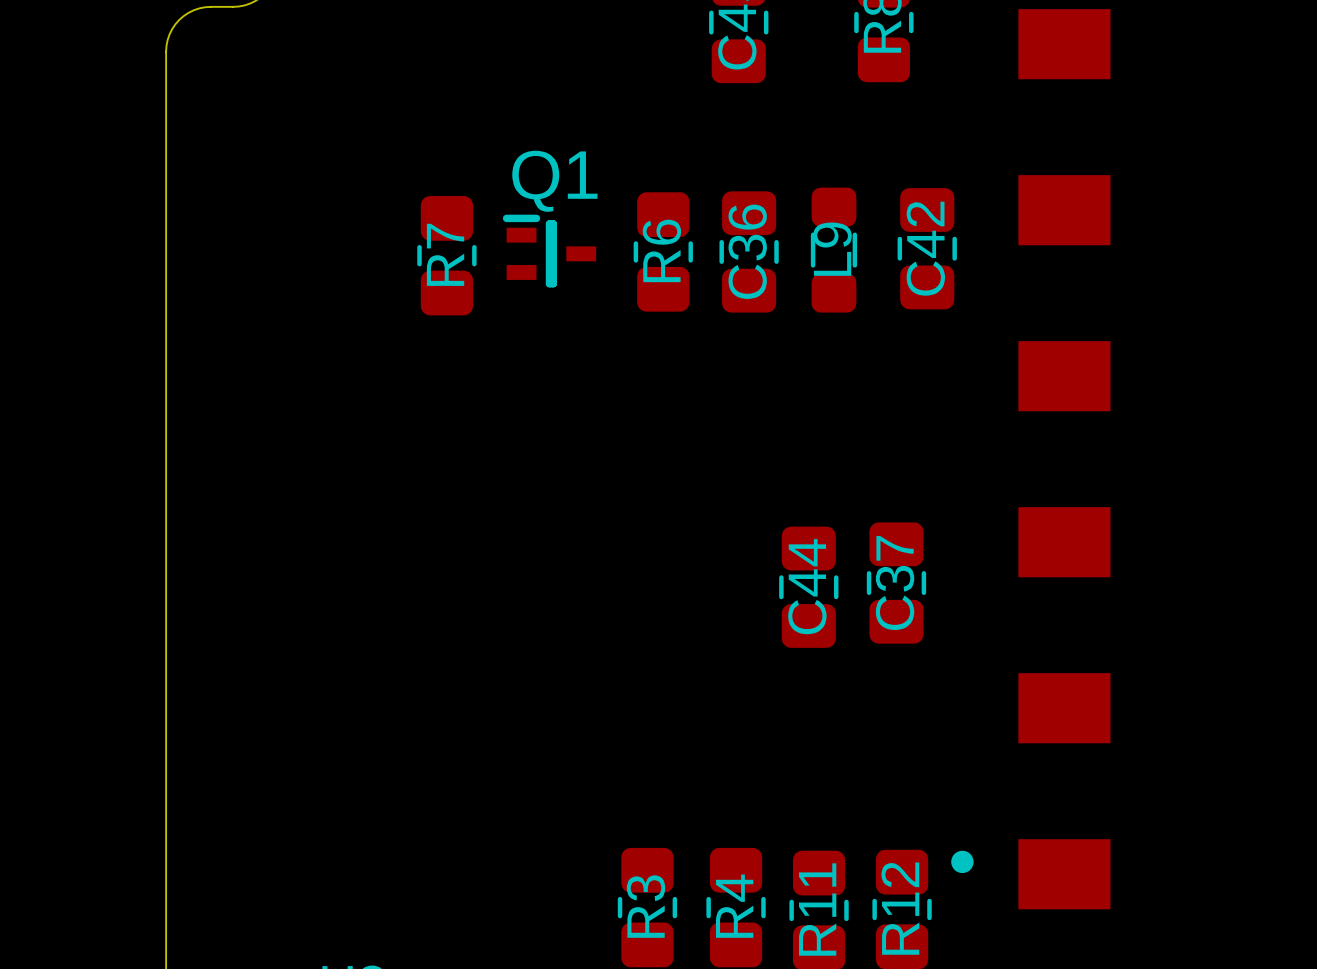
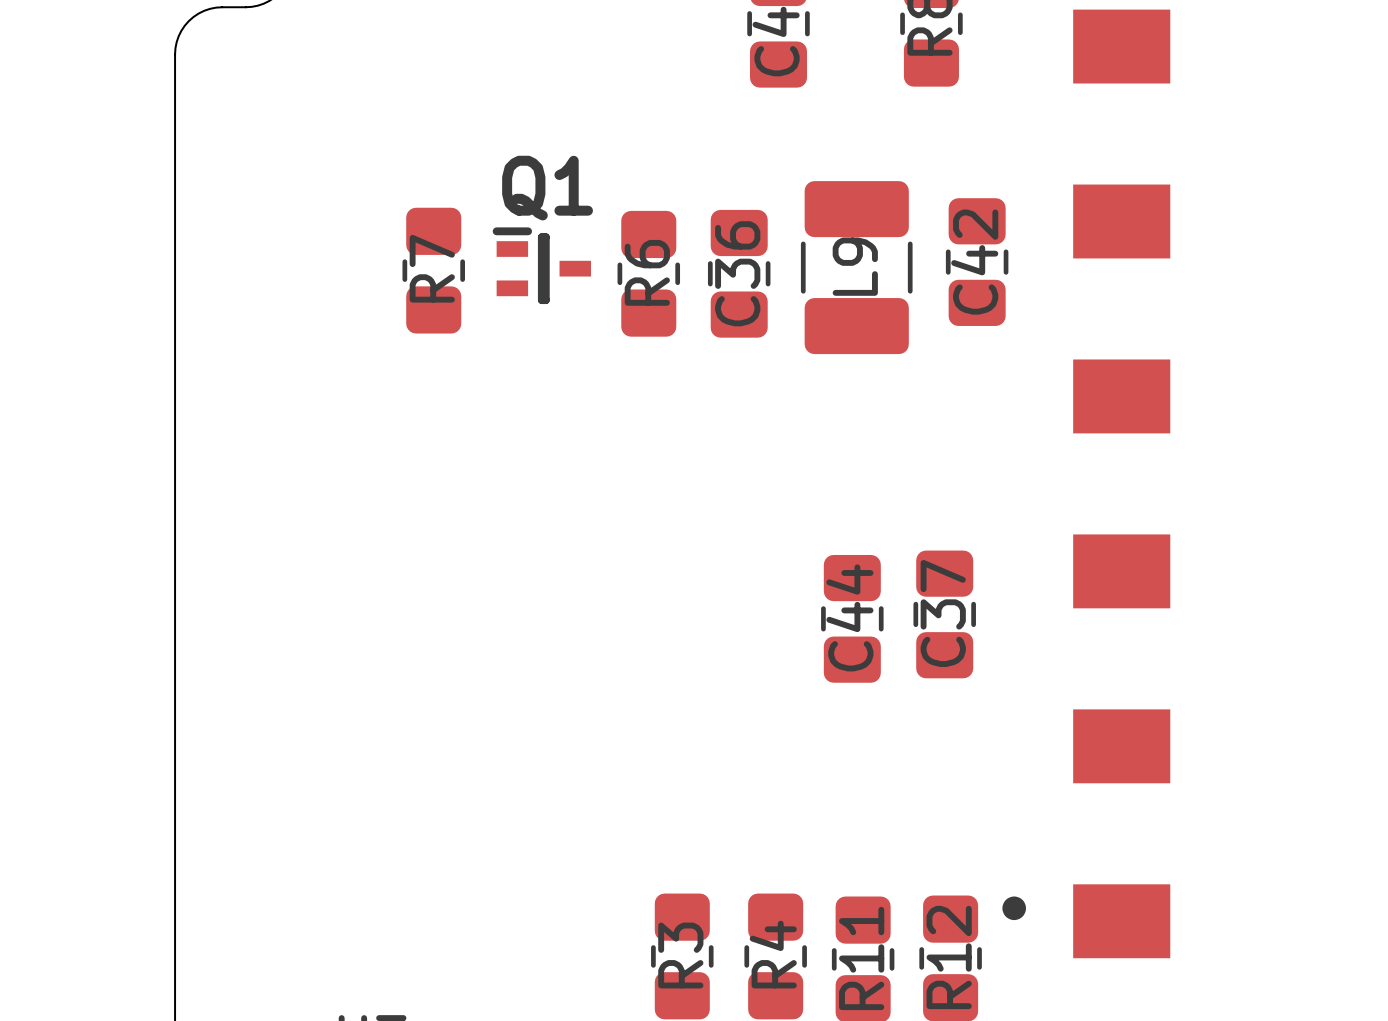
L9 footprint: [810, 187, 858, 313] -> [800, 181, 913, 355]
Q1 position: (549, 251) -> (541, 265)
R6 position: (663, 251) -> (648, 273)
C36 position: (749, 251) -> (739, 273)
R7 position: (446, 255) -> (433, 270)

